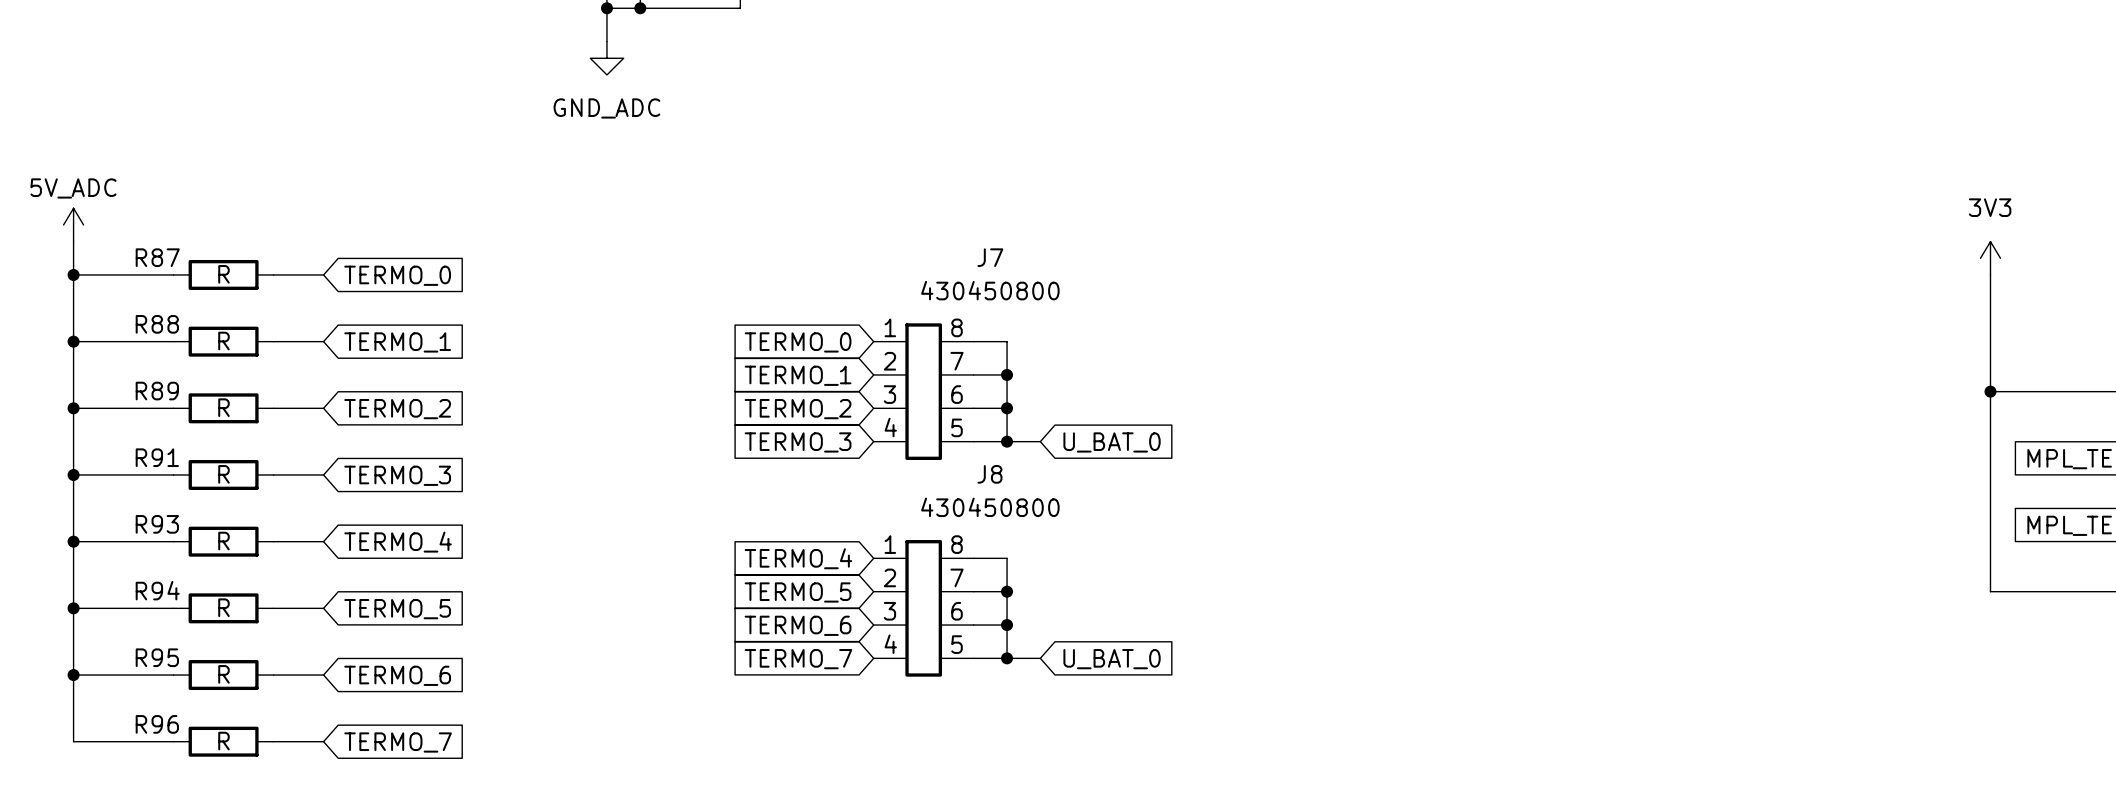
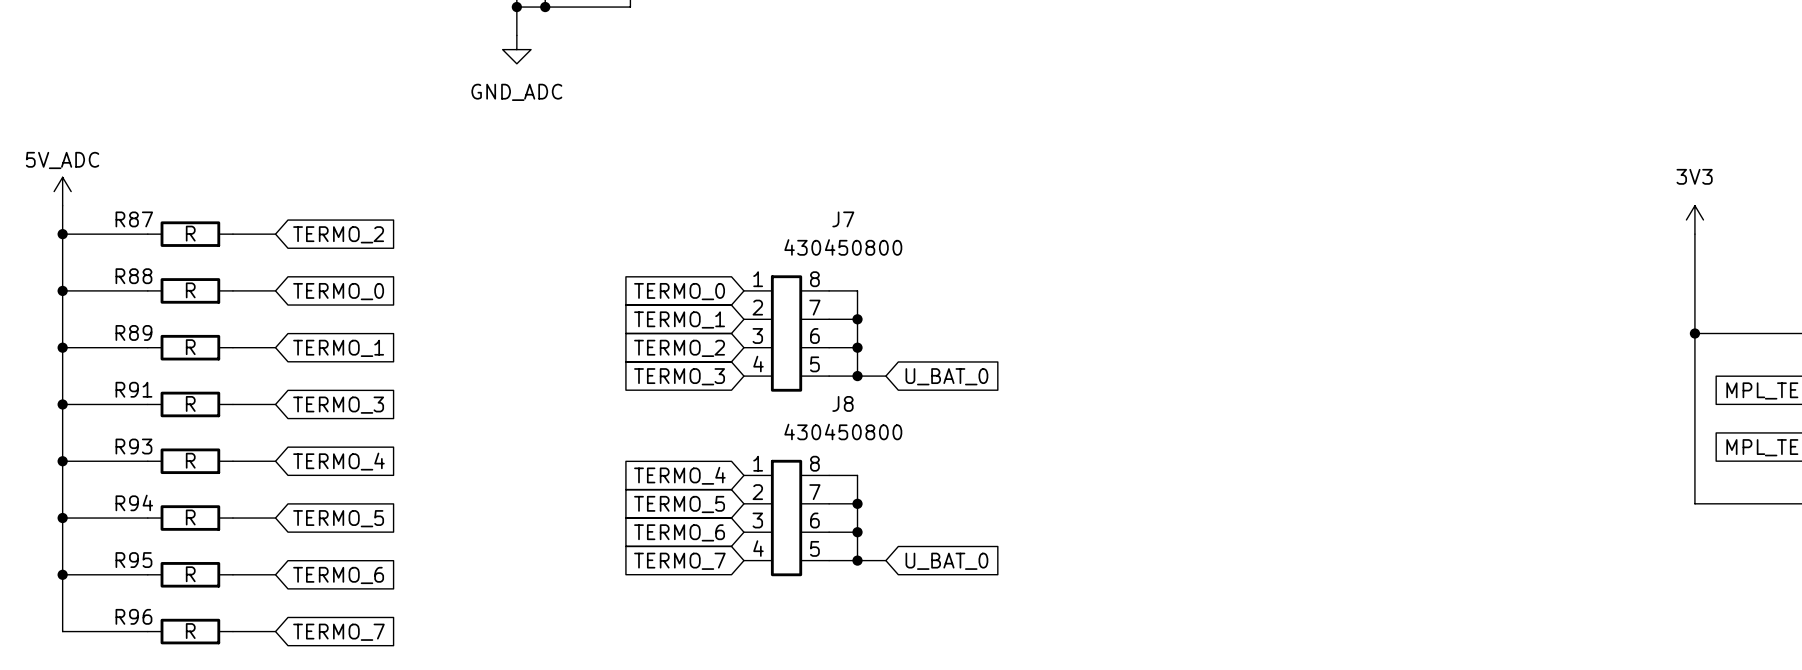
global label: TERMO_0 (397, 275) -> TERMO_2 (338, 234)
global label: TERMO_1 (397, 342) -> TERMO_0 (338, 291)
global label: TERMO_2 (397, 409) -> TERMO_1 (338, 348)

